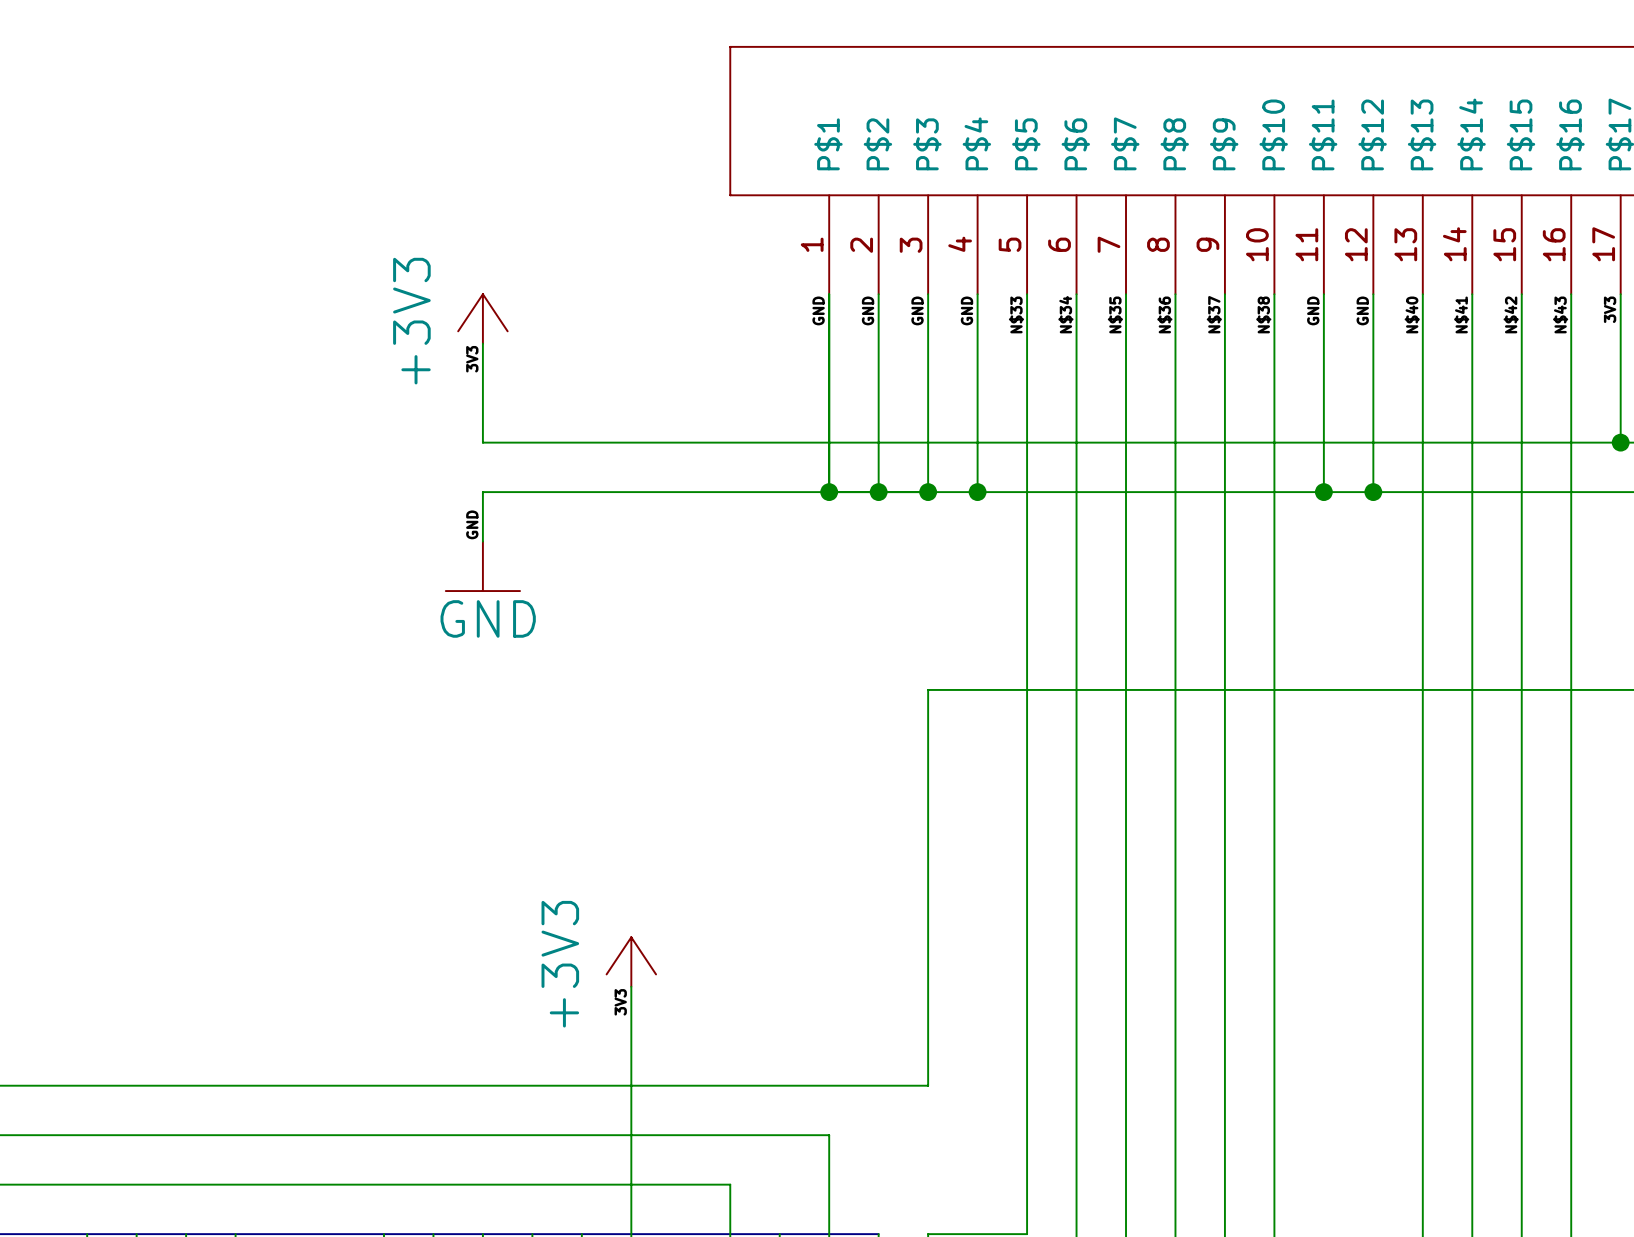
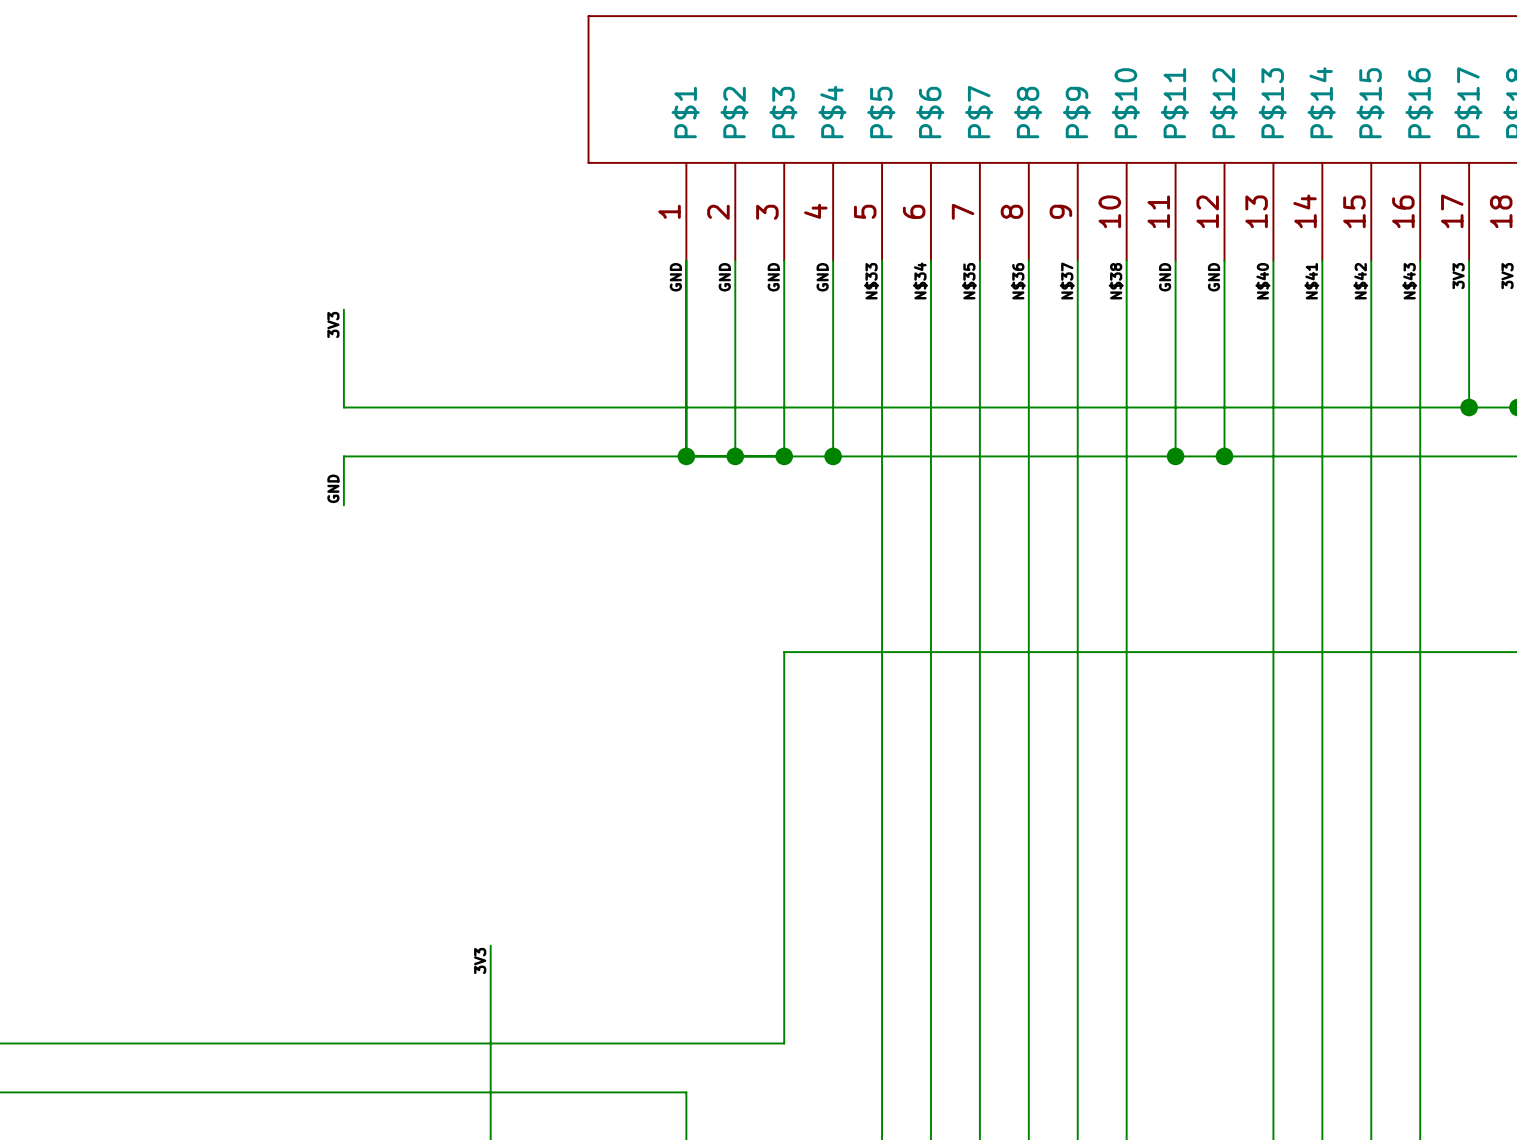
power symbol: +3V3 (482, 318) -> none
power symbol: GND (482, 566) -> none
power symbol: +3V3 (631, 962) -> none

